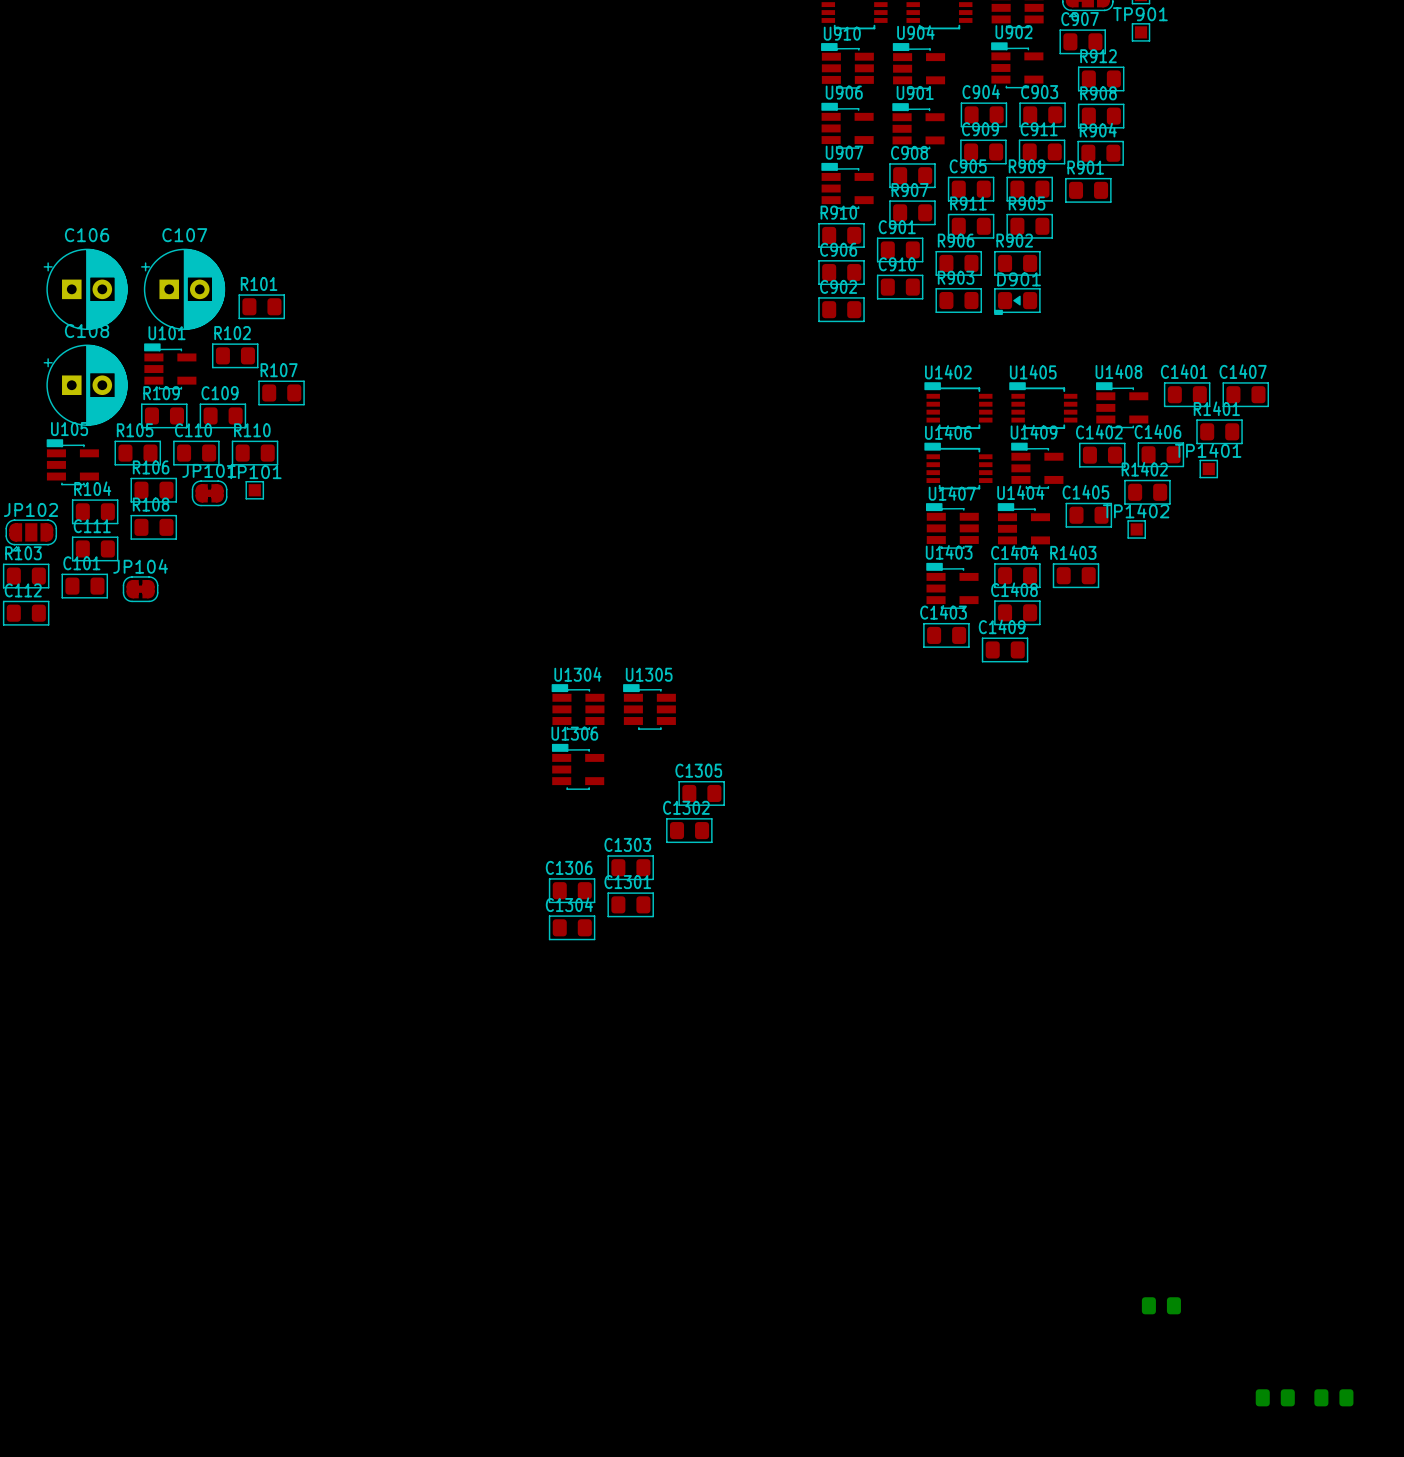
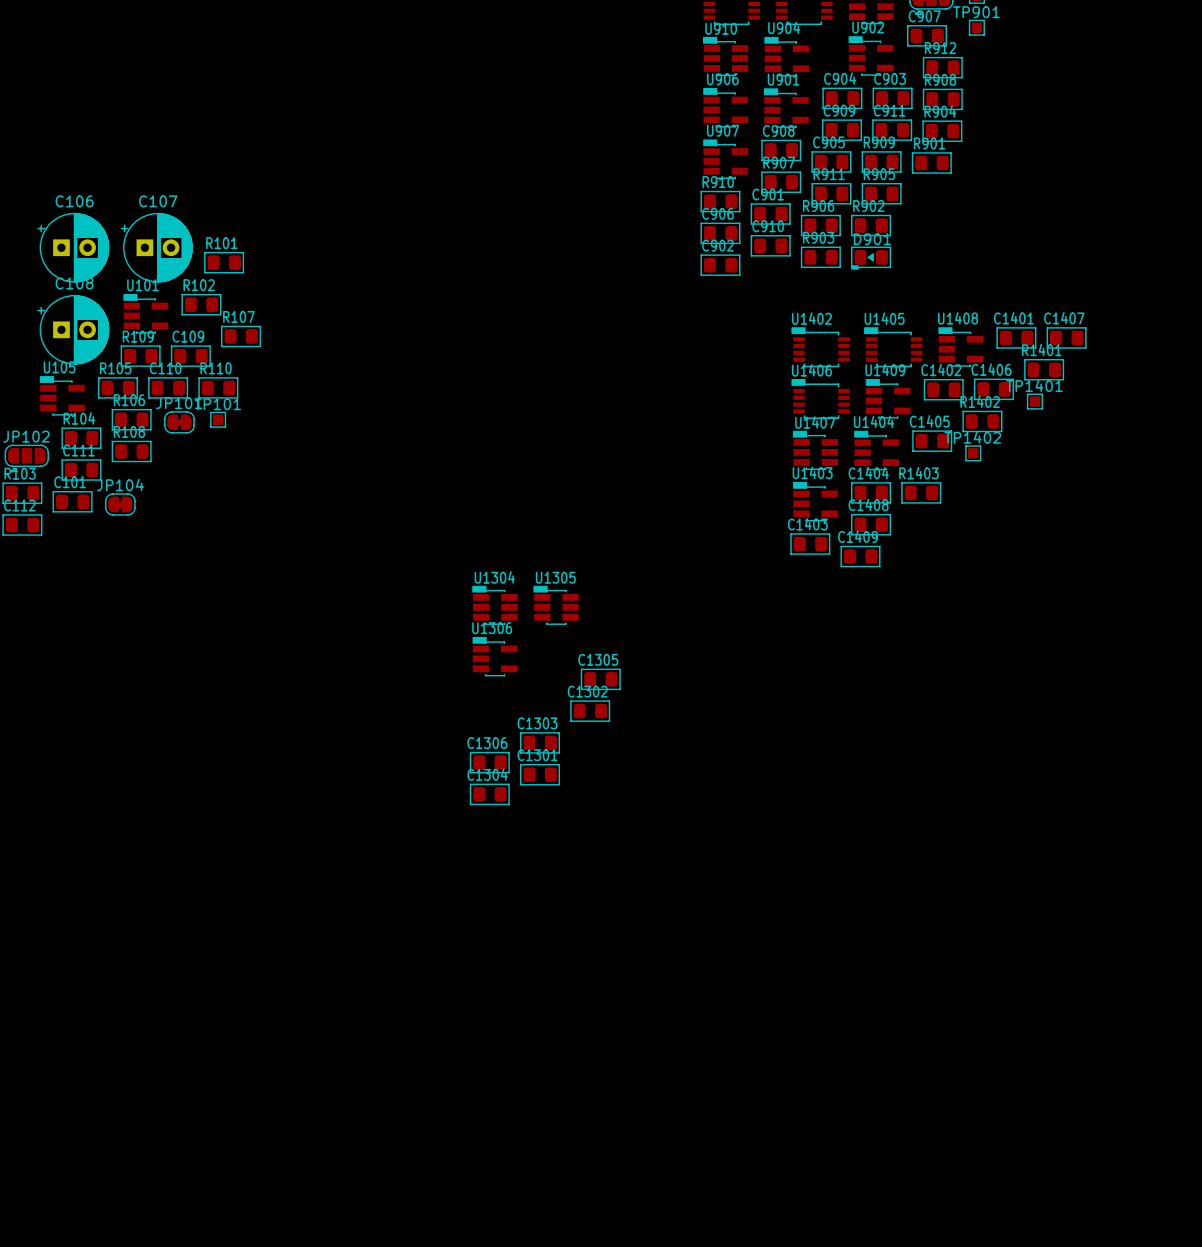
part: (1161, 1305) -> none
part: (1275, 1397) -> none
part: (1333, 1397) -> none

